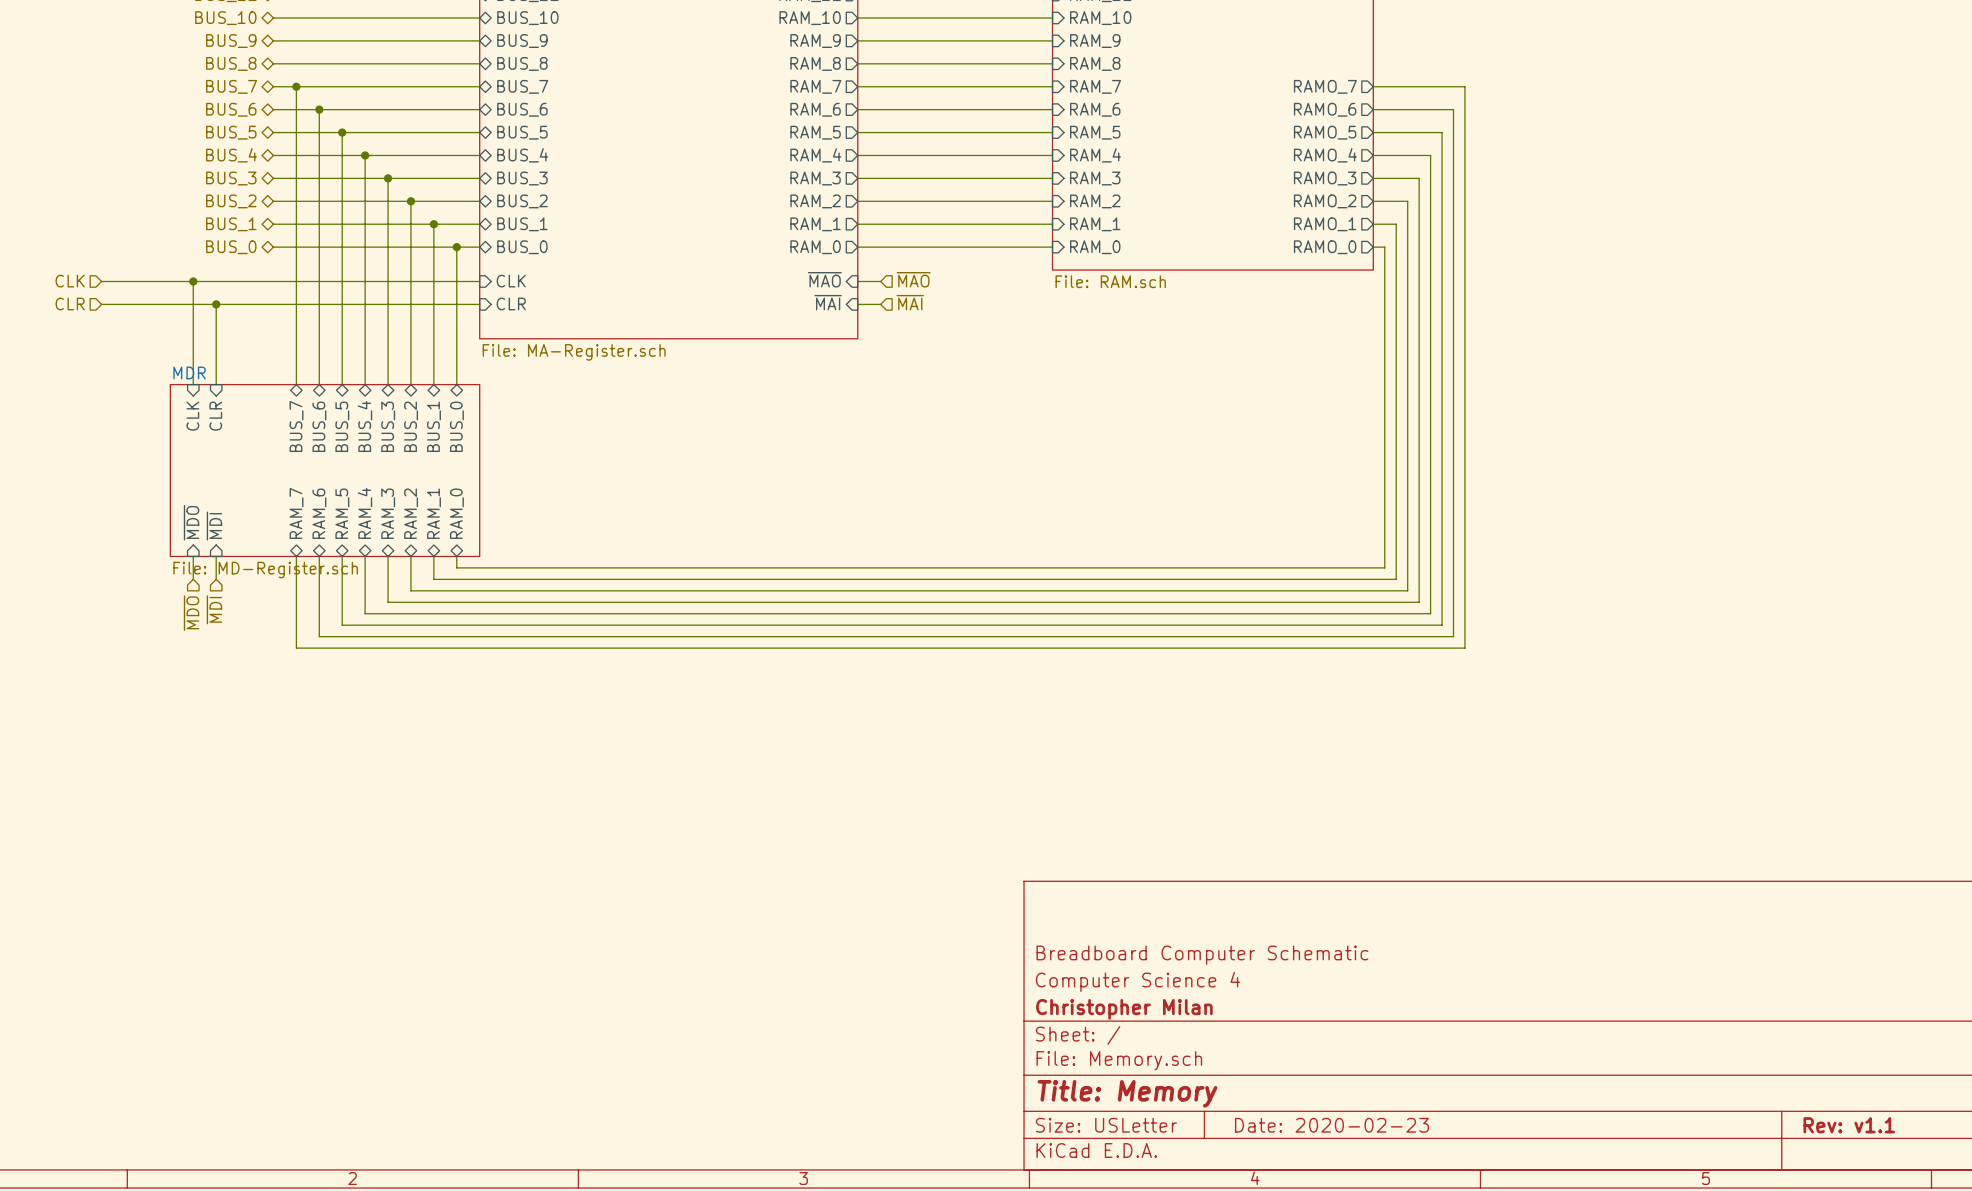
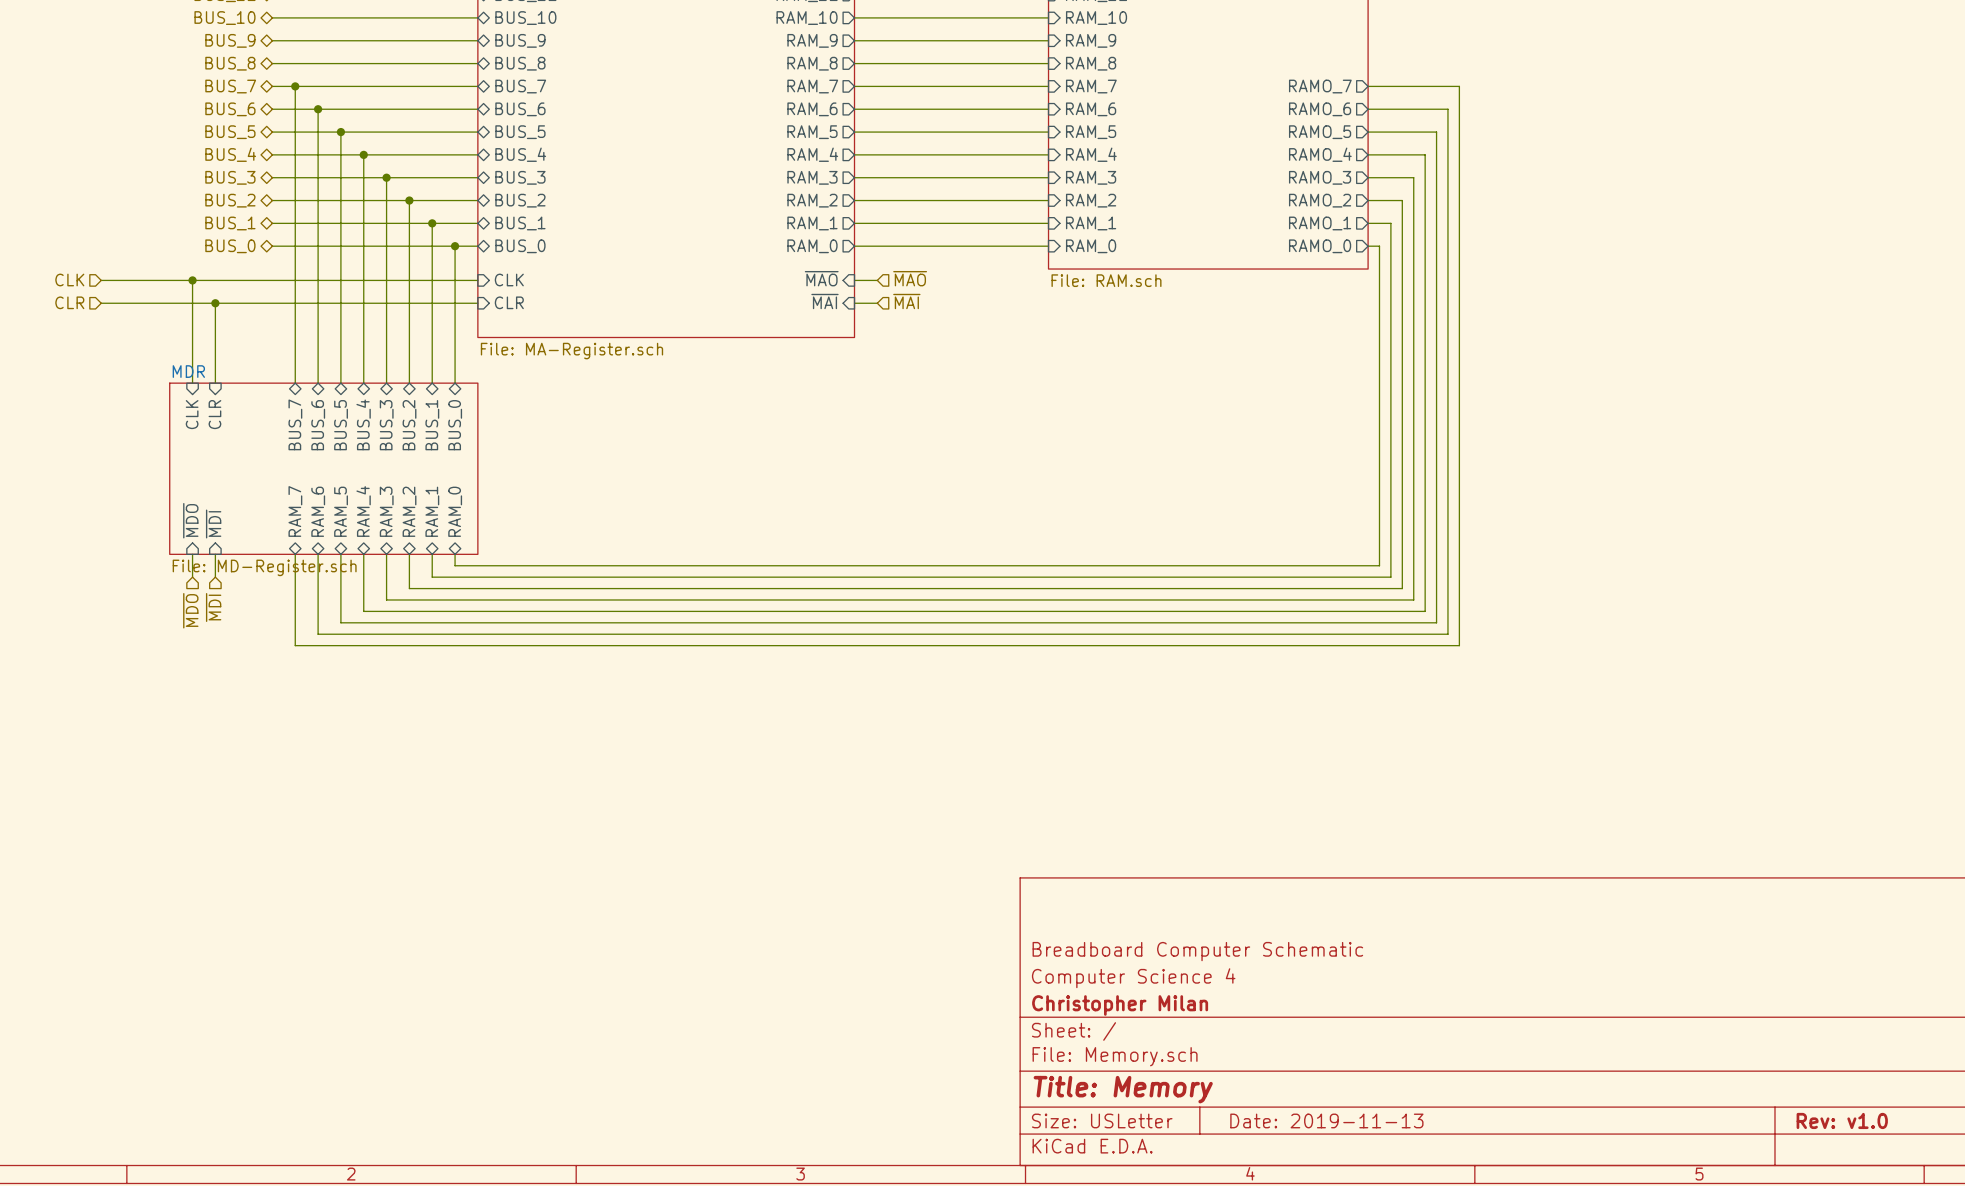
title block: Date: 2020-02-23 (1331, 1125) -> Date: 2019-11-13 (1326, 1120)
title block: Rev: v1.1 (1849, 1125) -> Rev: v1.0 (1842, 1120)

